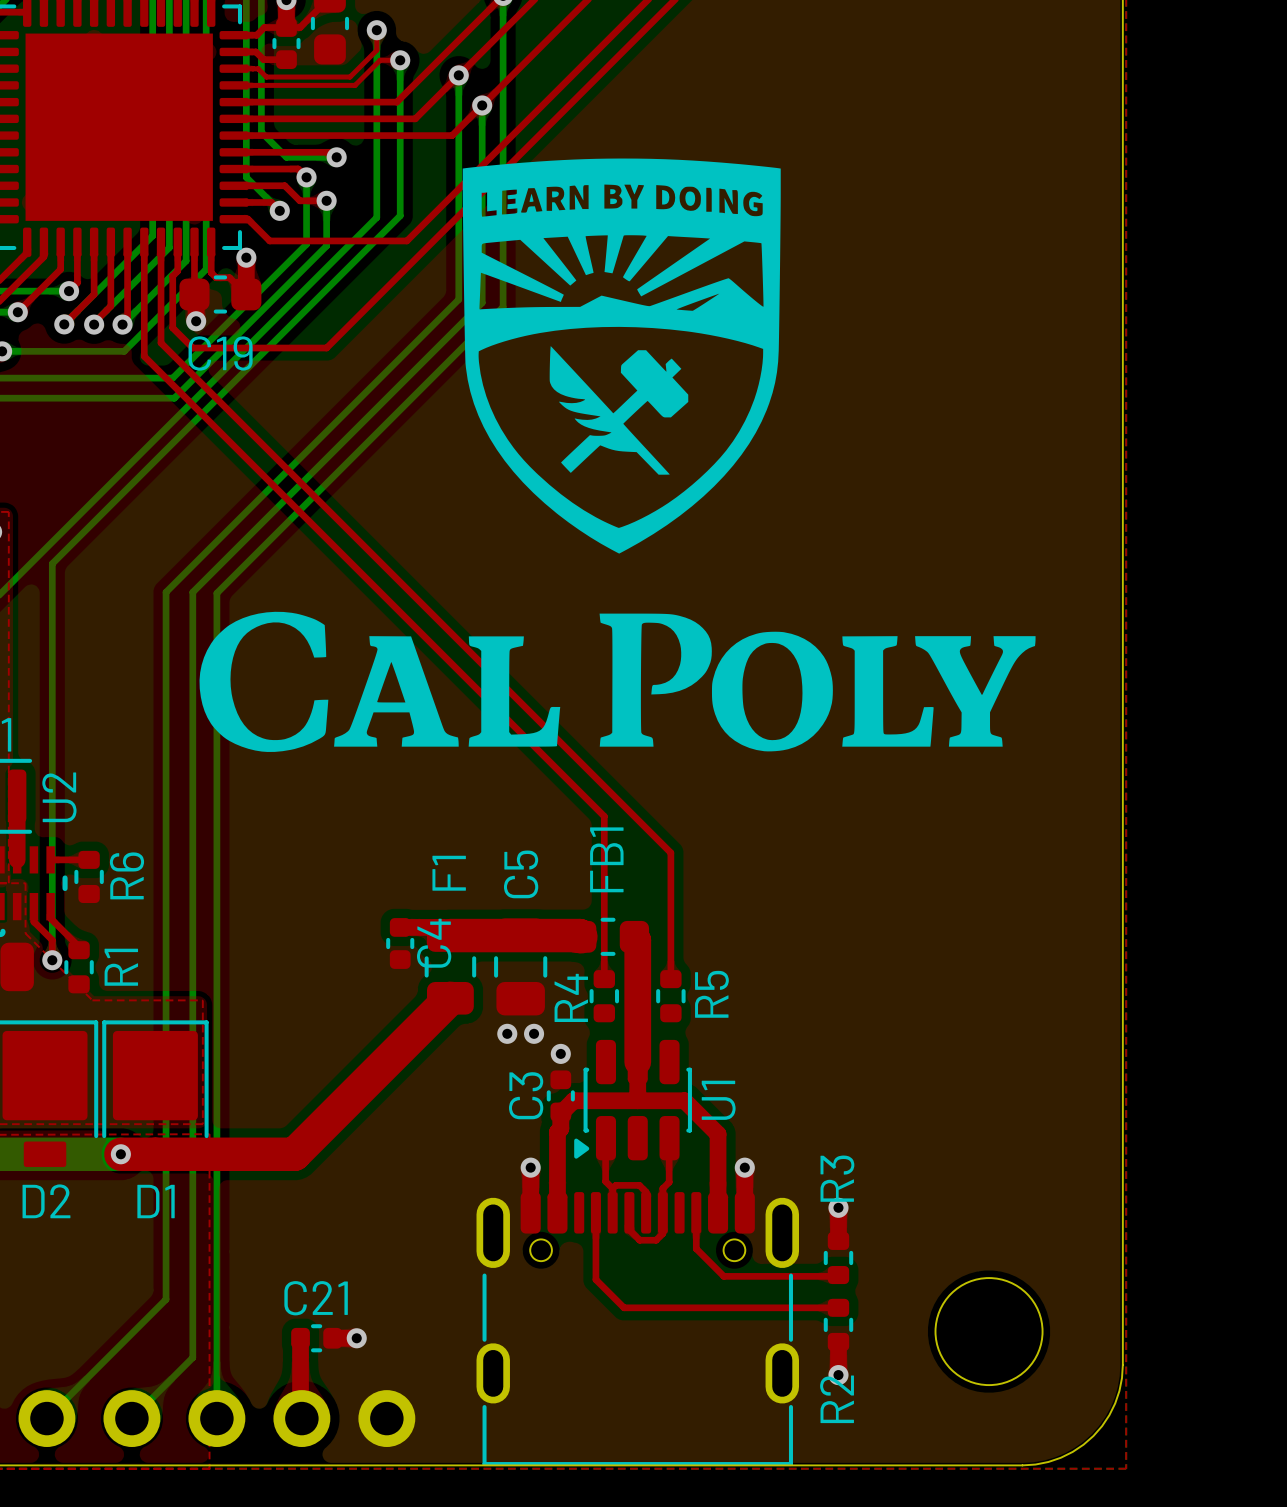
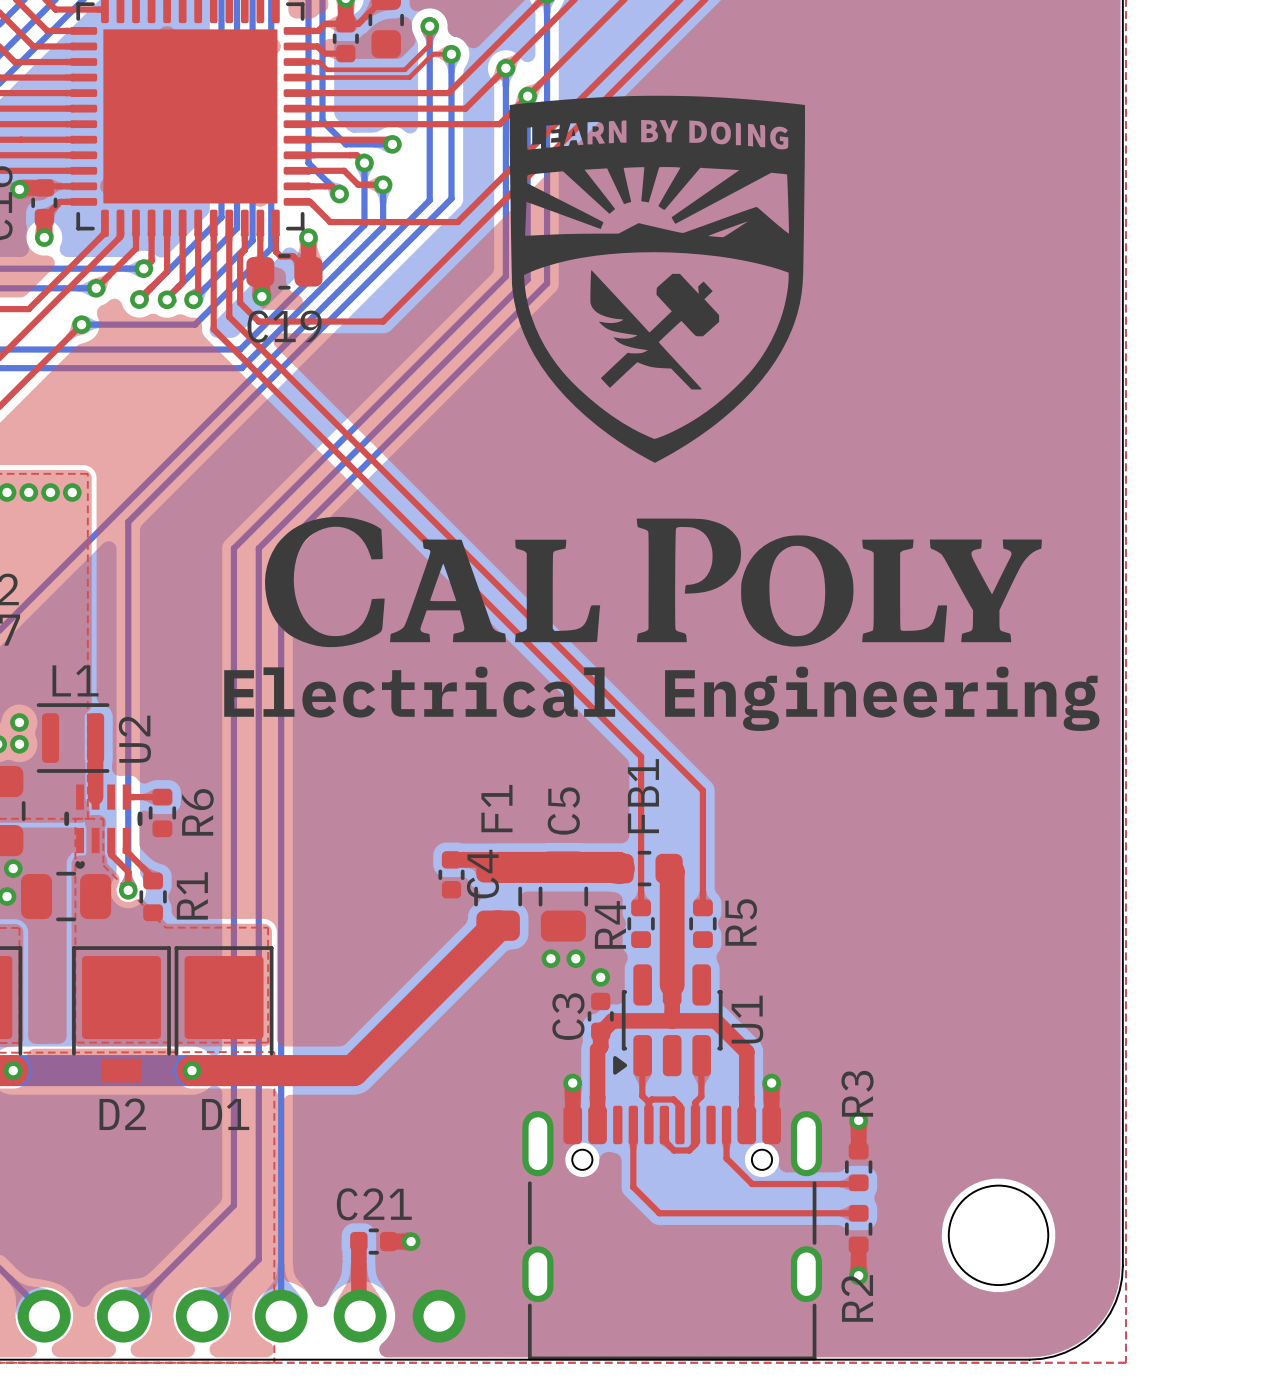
drawing position: (617, 455) -> (653, 371)
text: none -> Electrical Engineering (661, 698)

